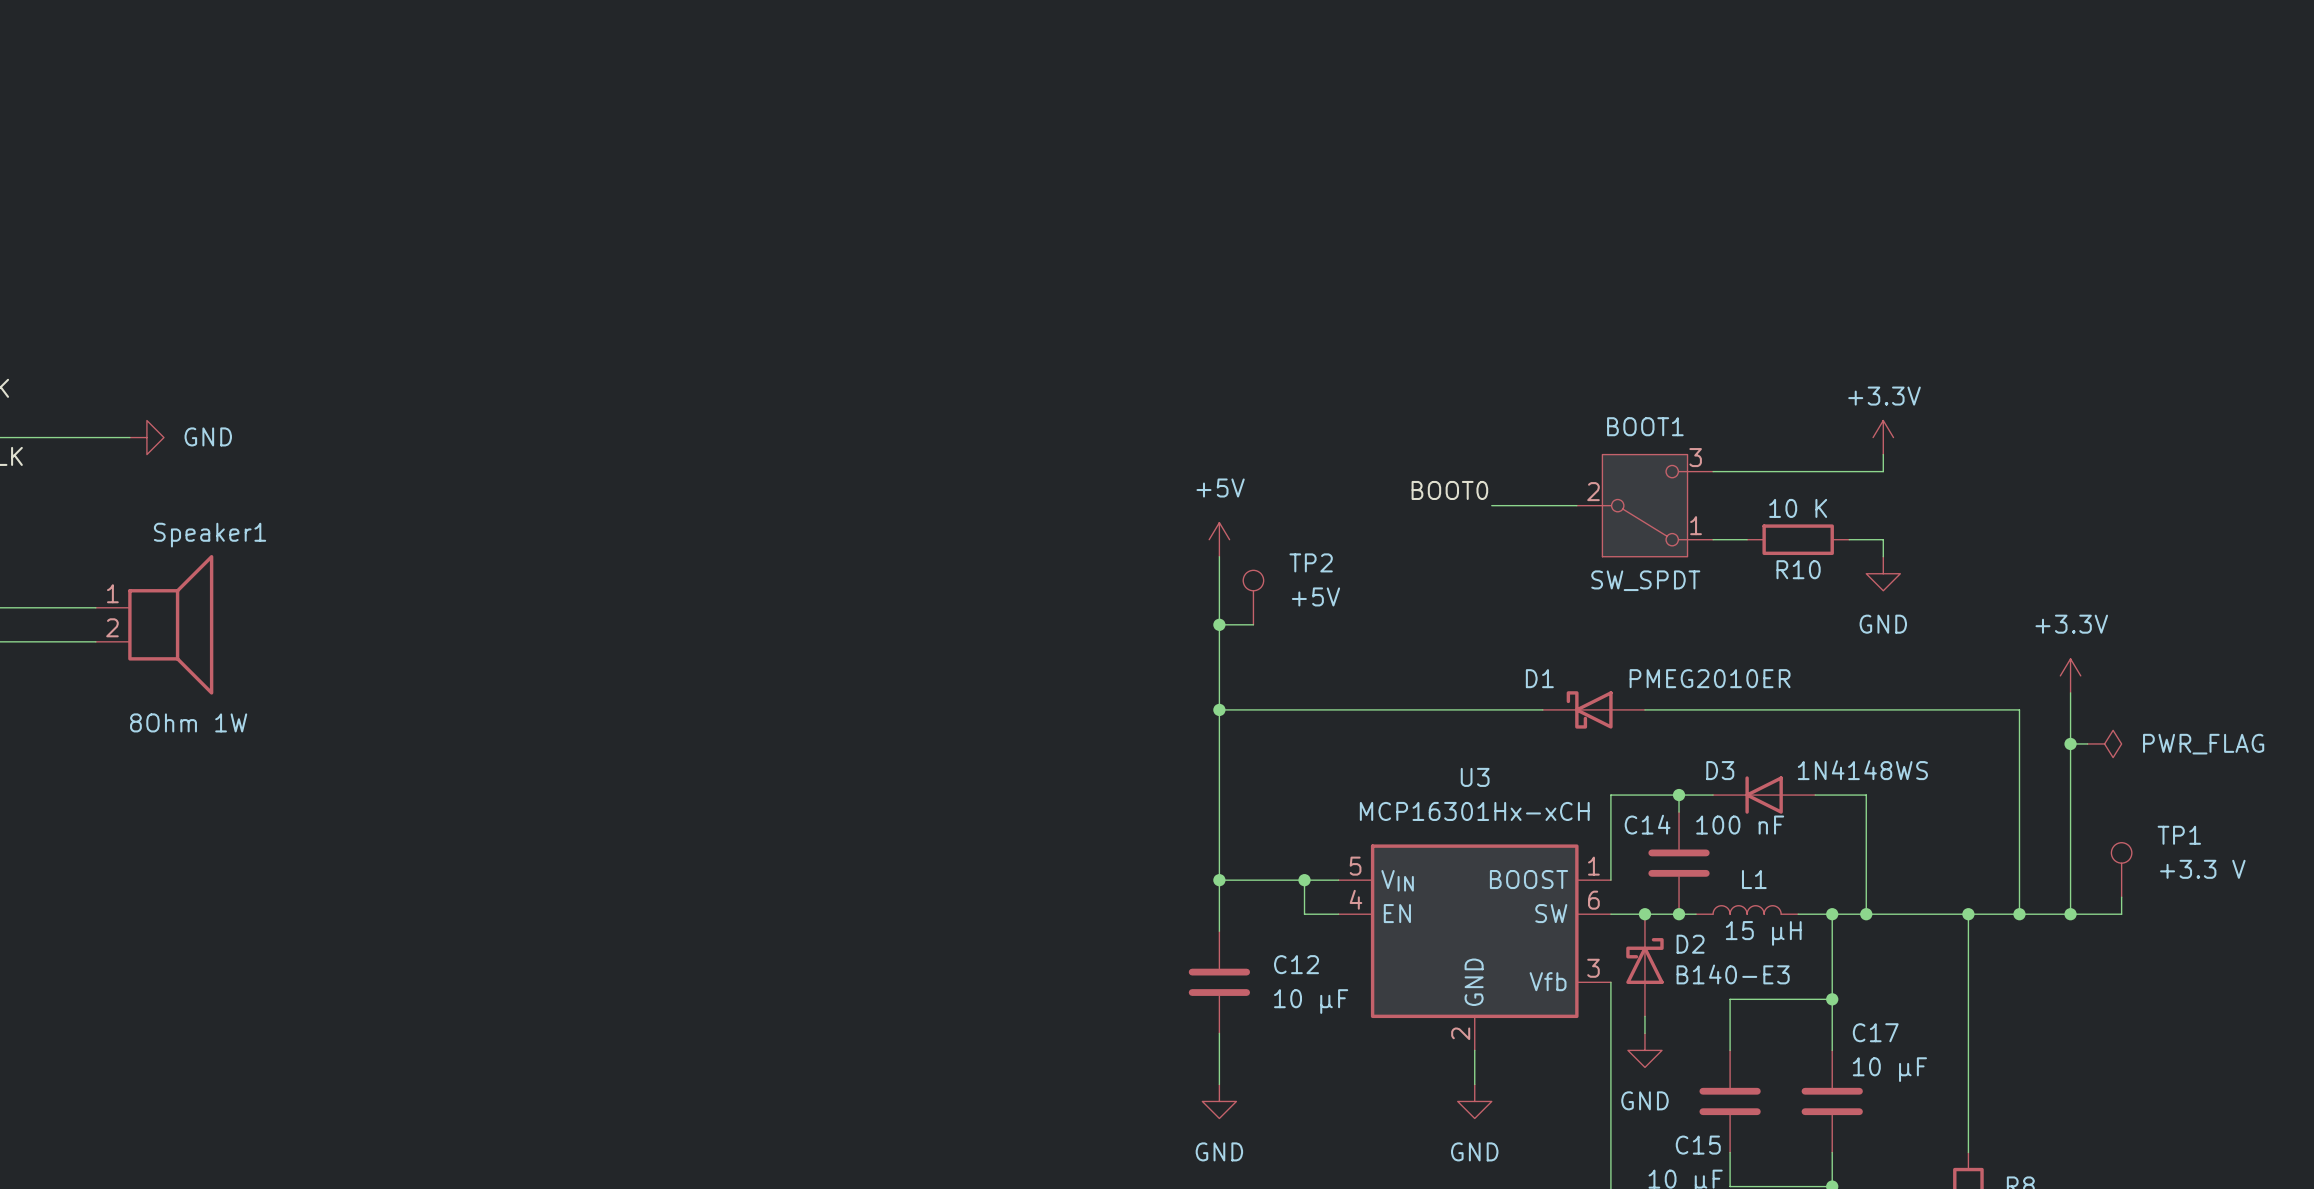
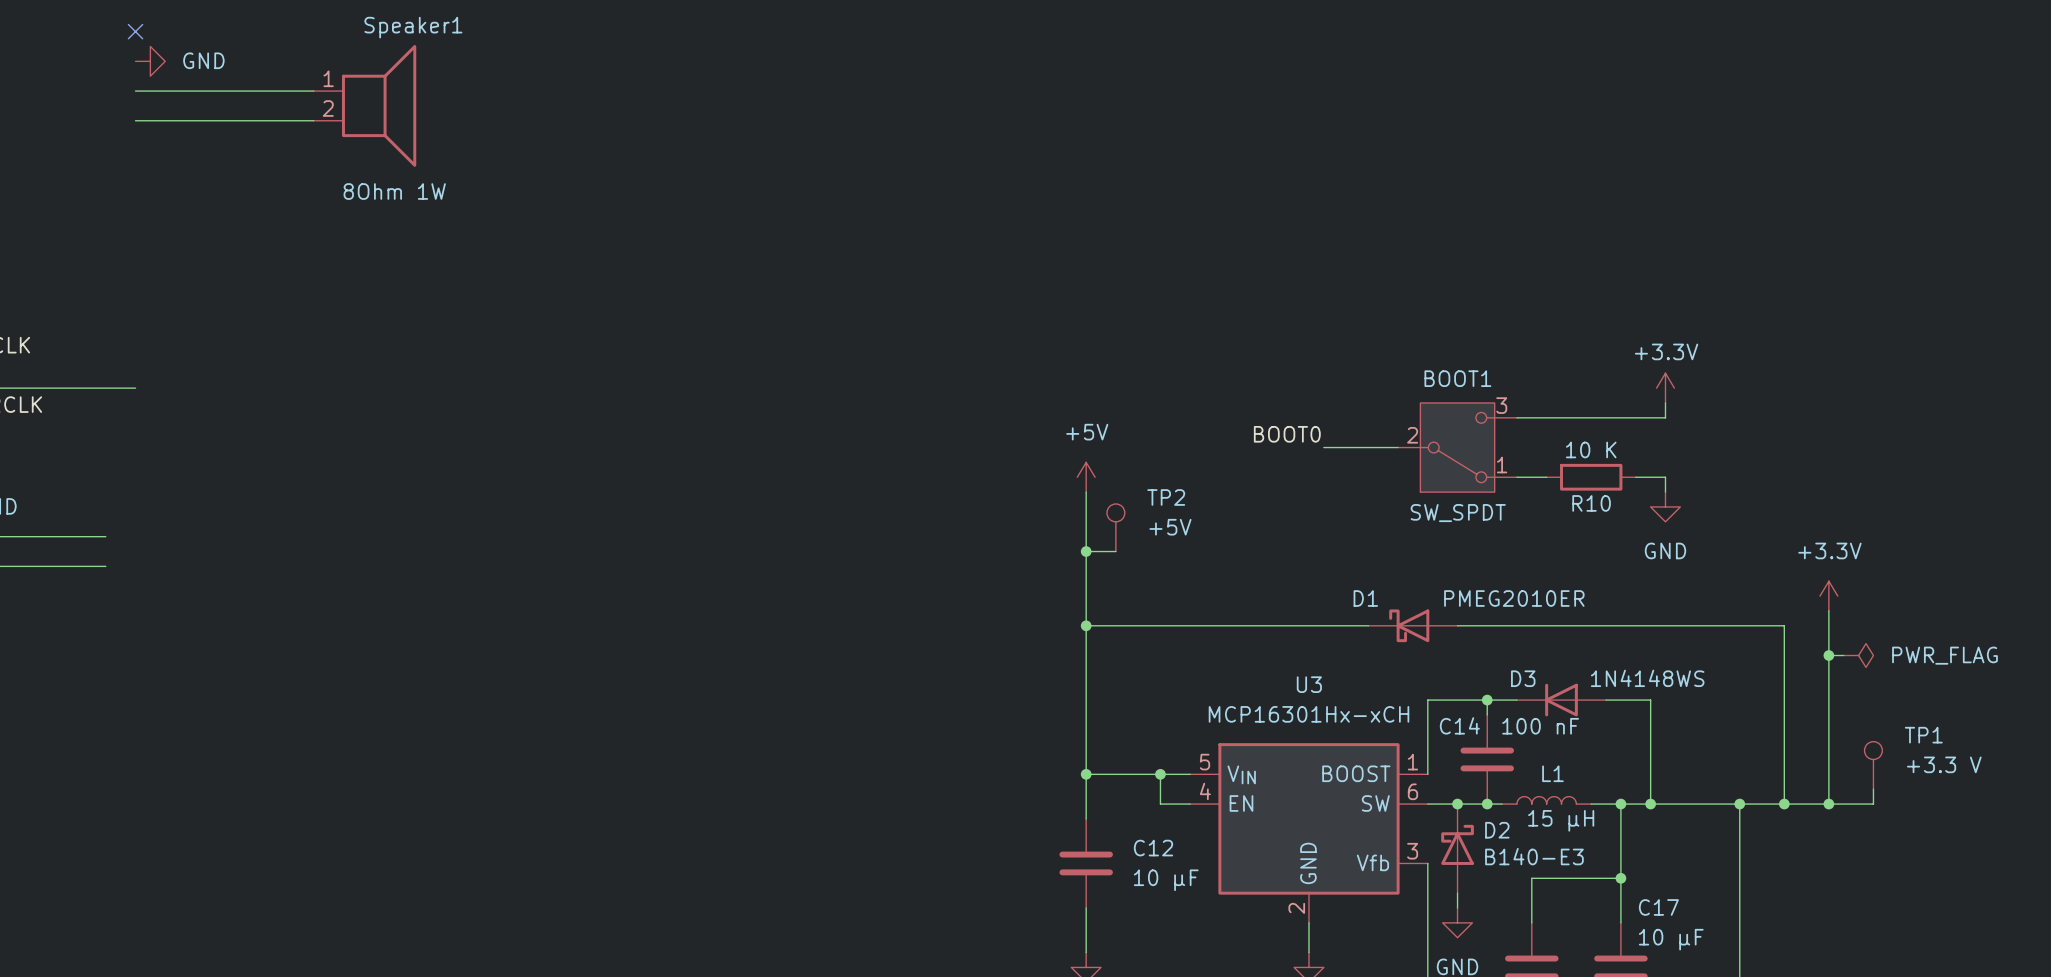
no-connect mark: none -> (135, 31)
power symbol: none -> GND (150, 61)
wire: none -> (135, 91) (313, 91)
wire: none -> (135, 120) (313, 120)
power symbol: GND (146, 437) -> none
Speaker1 position: (154, 624) -> (365, 105)

